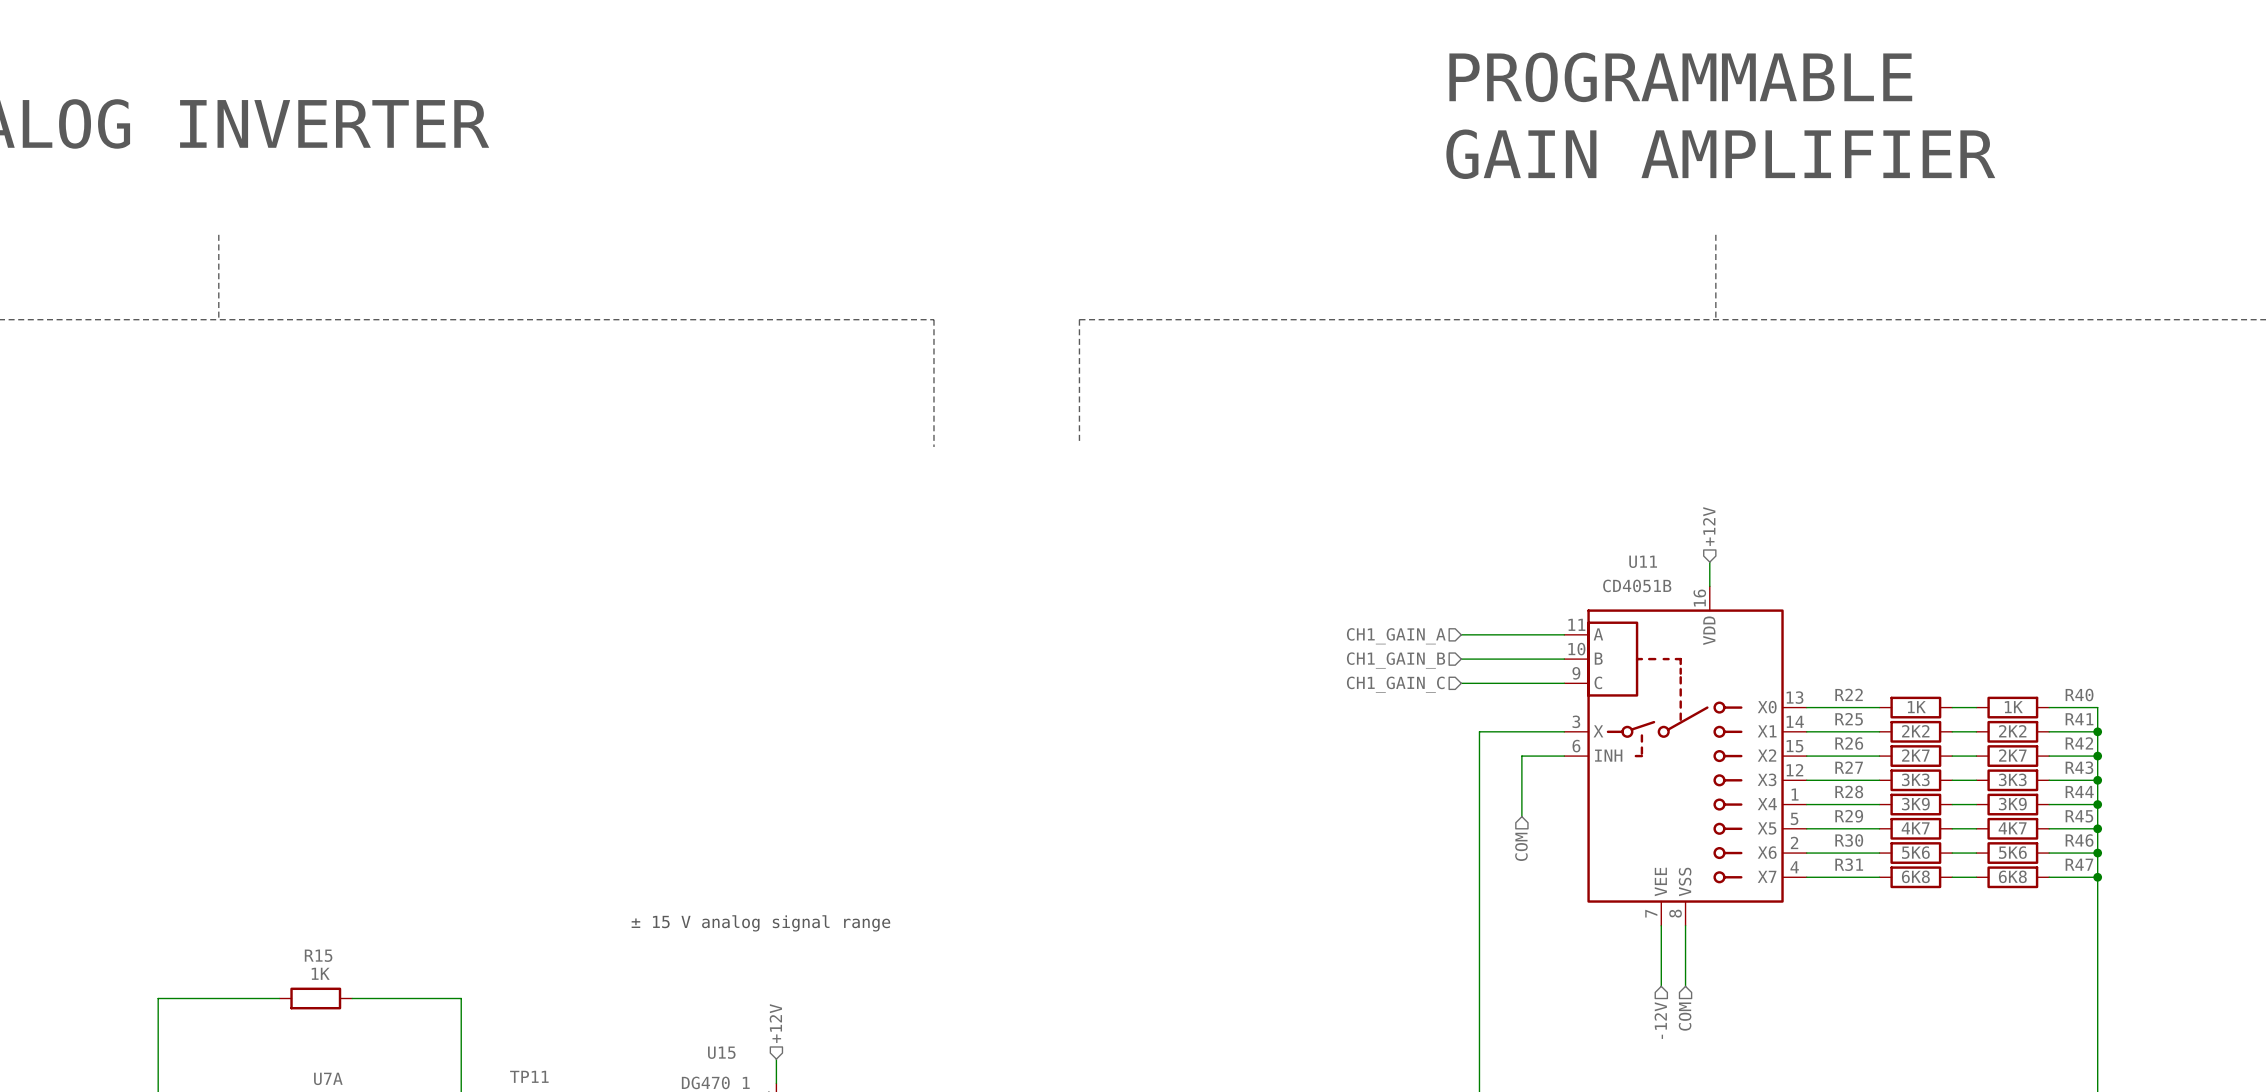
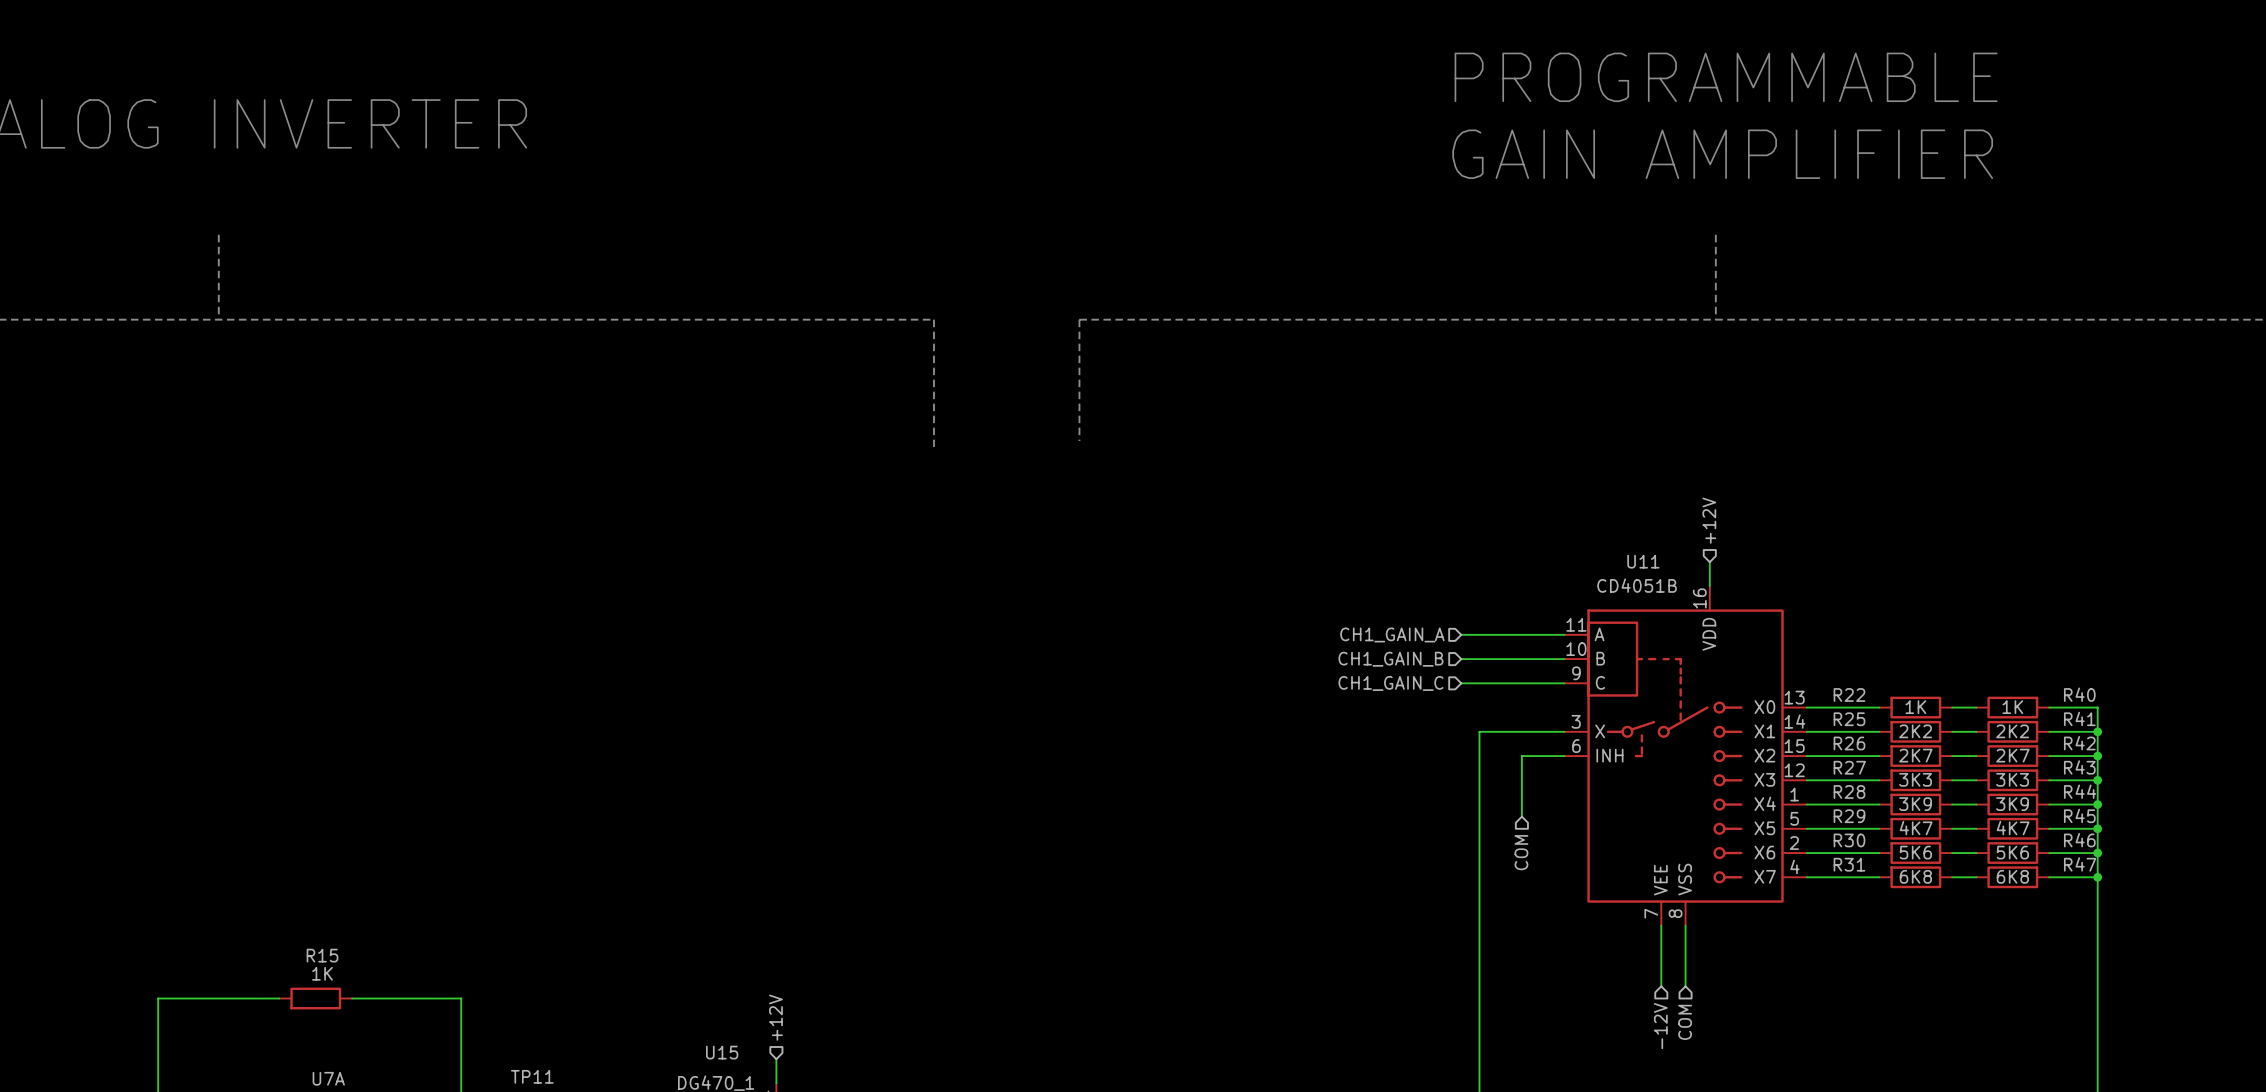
text: ± 15 V analog signal range (760, 923) -> none

